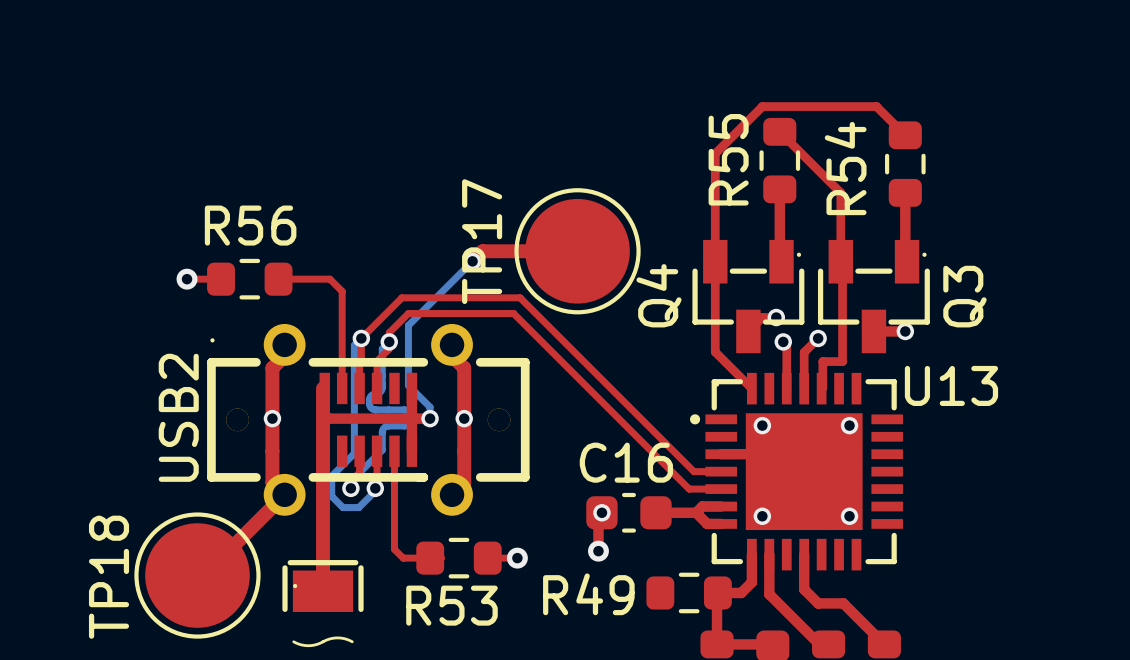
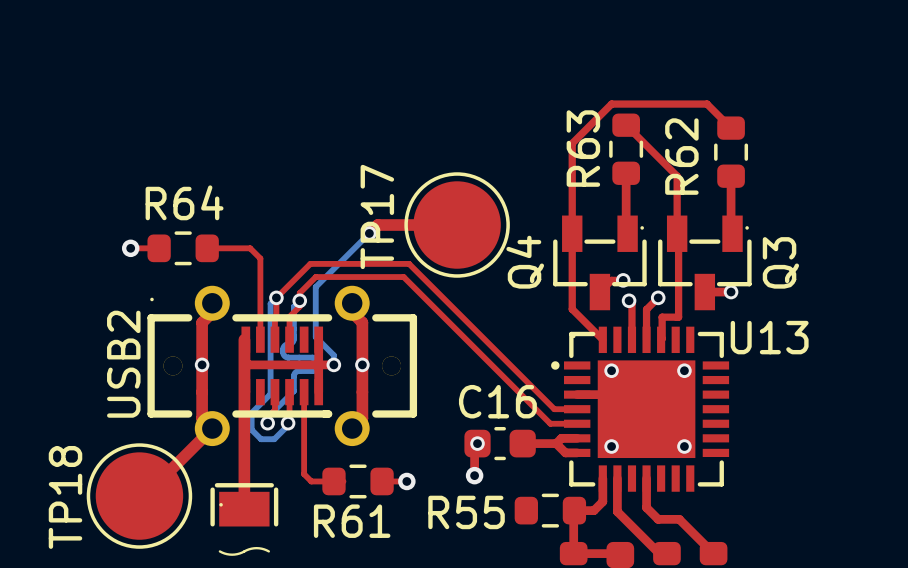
R55 name: R55 (728, 159) -> R63 (583, 148)
R54 name: R54 (845, 168) -> R62 (681, 156)
R56 name: R56 (250, 225) -> R64 (184, 202)
R49 name: R49 (588, 594) -> R55 (466, 512)
R53 name: R53 (451, 605) -> R61 (352, 521)

